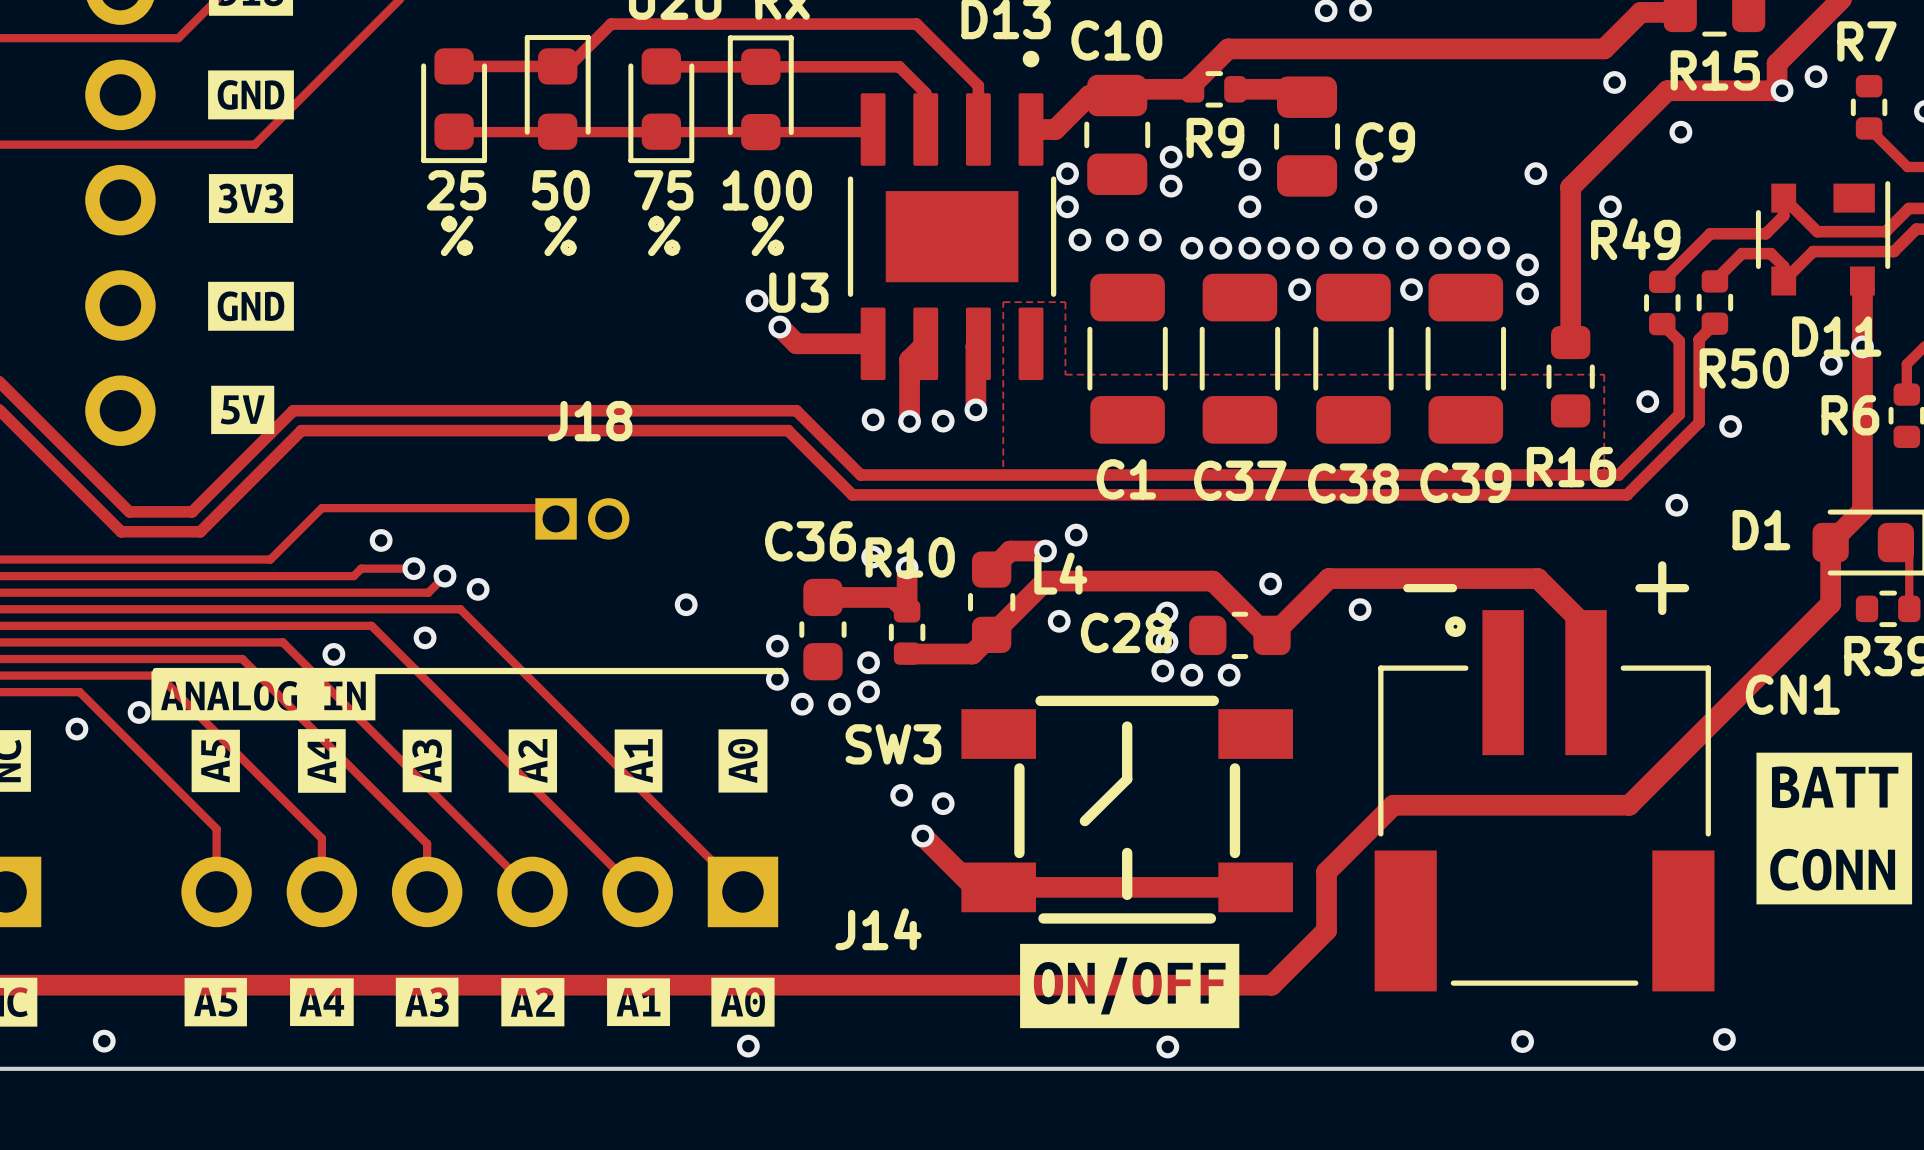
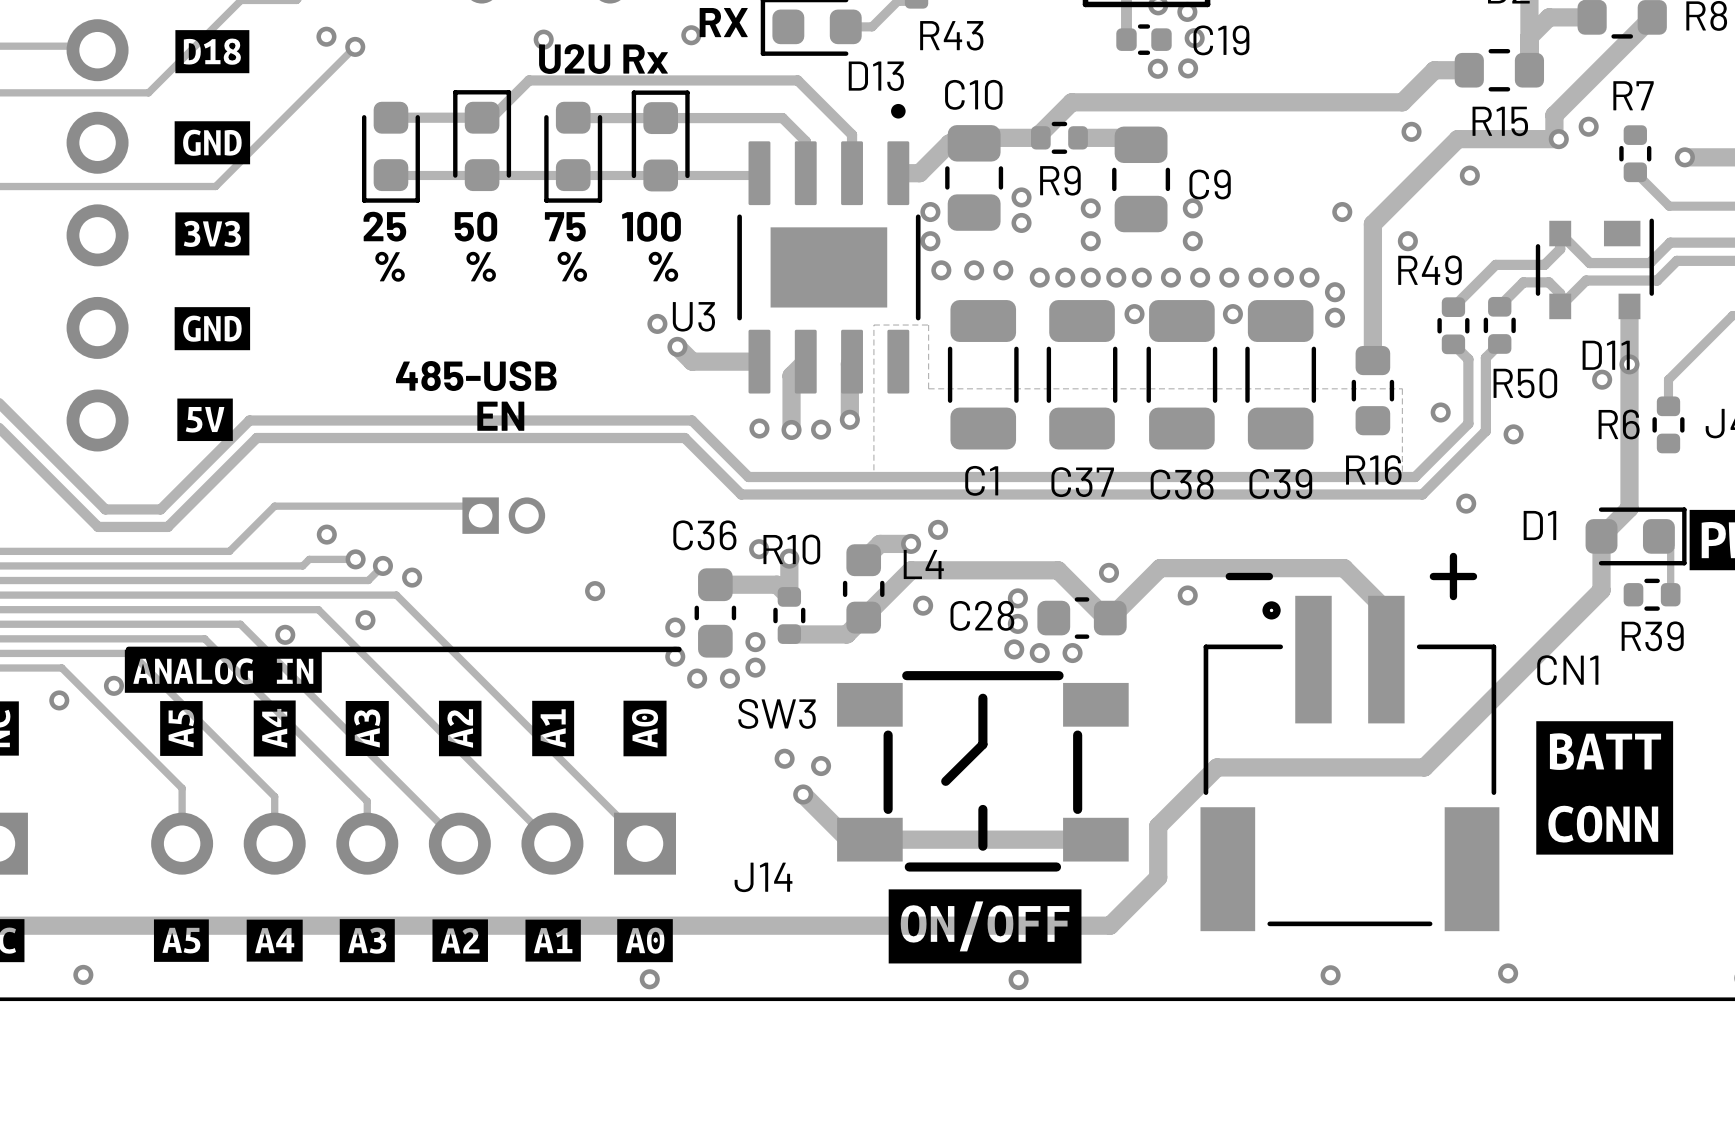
text: none -> 485-USB (476, 376)
text: none -> EN (500, 416)
J18 name: J18 (590, 421) -> none

